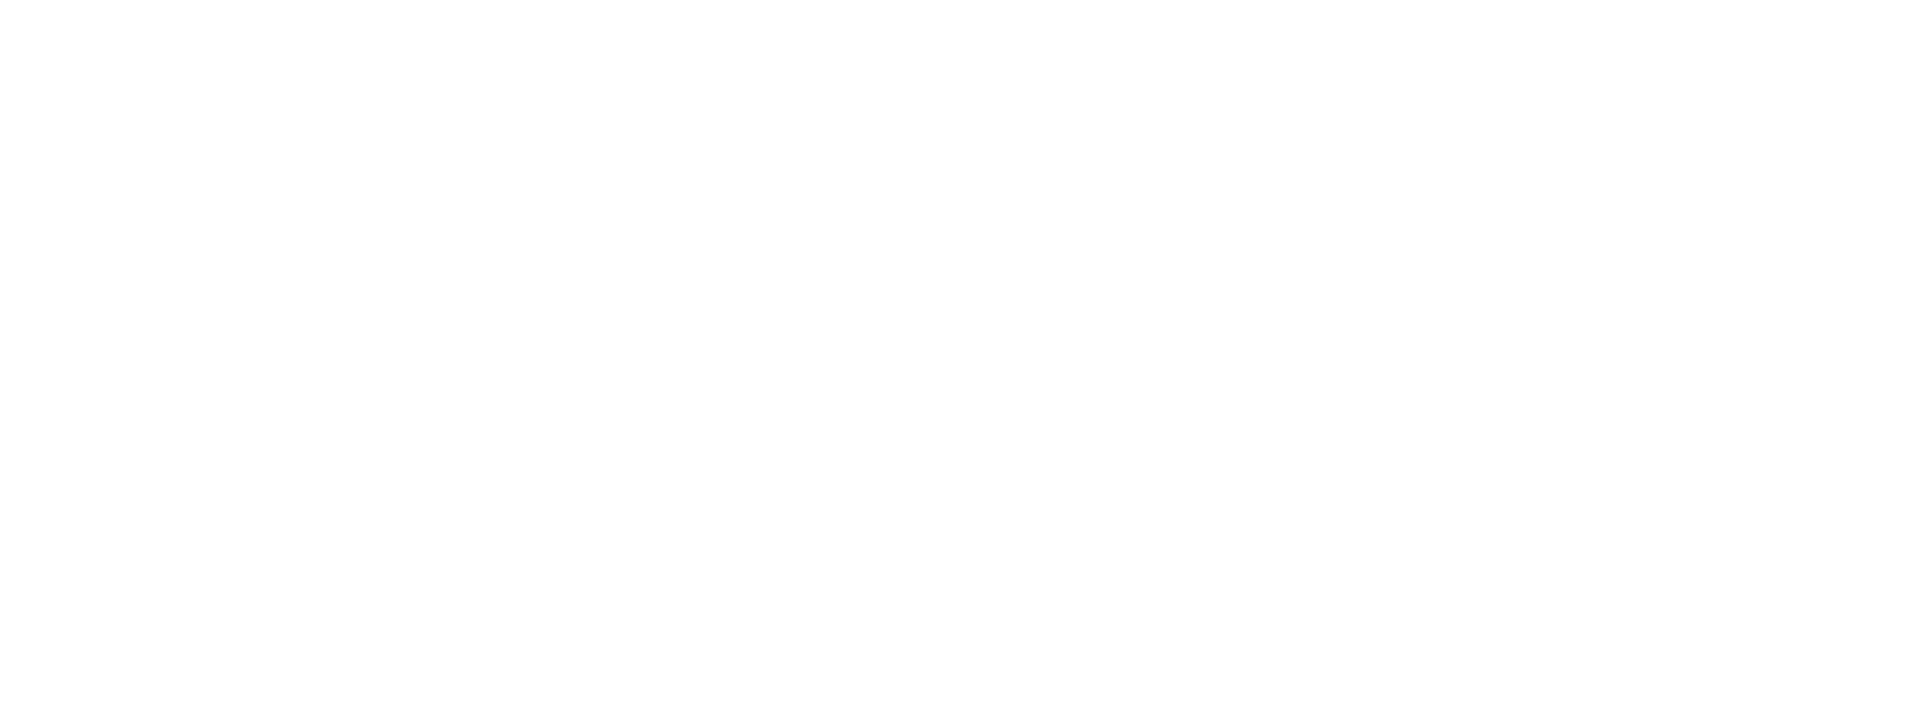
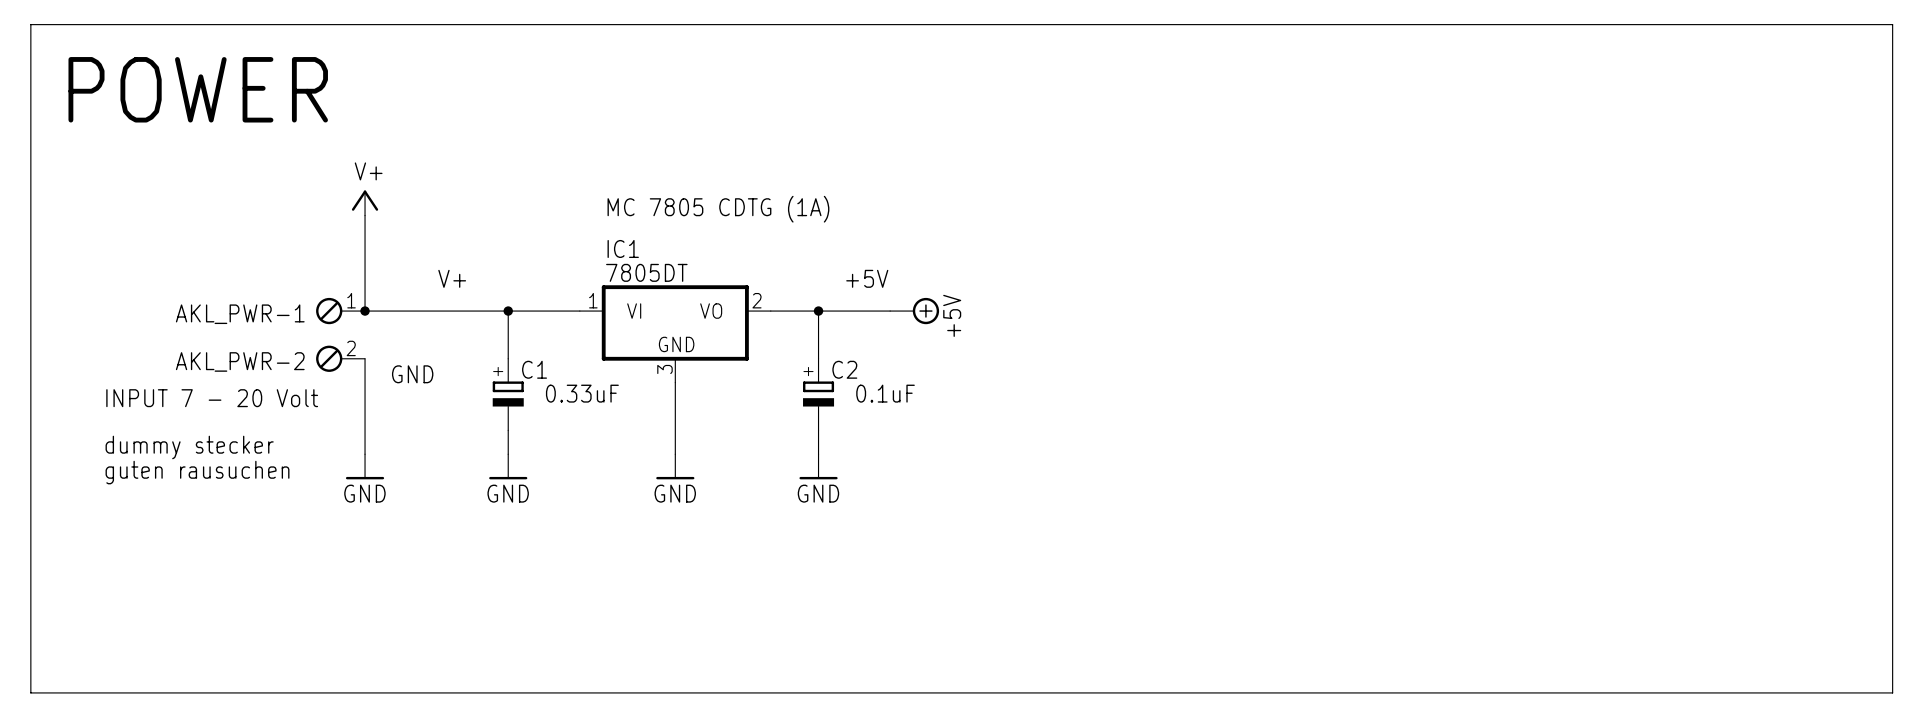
wire: none -> (30, 24) (1892, 24) (1892, 692) (30, 692) (30, 24)
text: none -> POWER (198, 89)
power symbol: none -> V+ (365, 203)
text: none -> MC 7805 CDTG (1A) (718, 209)
wire: none -> (365, 215) (365, 311) (579, 311)
label: none -> V+ (452, 278)
label: none -> +5V (867, 278)
AKL_PWR-1: none -> (340, 311)
junction: none -> (365, 311)
wire: none -> (508, 311) (508, 358)
junction: none -> (508, 311)
wire: none -> (770, 311) (890, 311)
wire: none -> (818, 311) (818, 358)
junction: none -> (818, 311)
power symbol: none -> +5V (914, 311)
IC1: none -> 7805DT (675, 333)
AKL_PWR-2: none -> (340, 358)
wire: none -> (365, 358) (365, 454)
label: none -> GND (412, 374)
wire: none -> (675, 382) (675, 454)
C1: none -> 0.33uF (508, 394)
C2: none -> 0.1uF (818, 394)
text: none -> INPUT 7 - 20 Volt (212, 398)
wire: none -> (508, 430) (508, 454)
wire: none -> (818, 430) (818, 454)
text: none -> dummy stecker (189, 447)
power symbol: none -> GND (365, 466)
power symbol: none -> GND (508, 466)
power symbol: none -> GND (675, 466)
power symbol: none -> GND (818, 466)
text: none -> guten rausuchen (197, 472)

